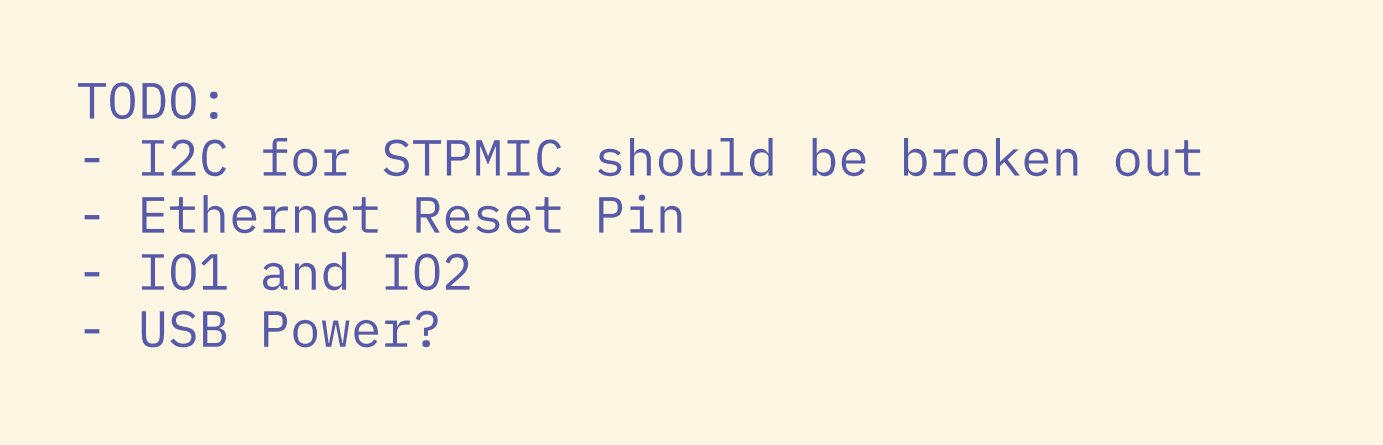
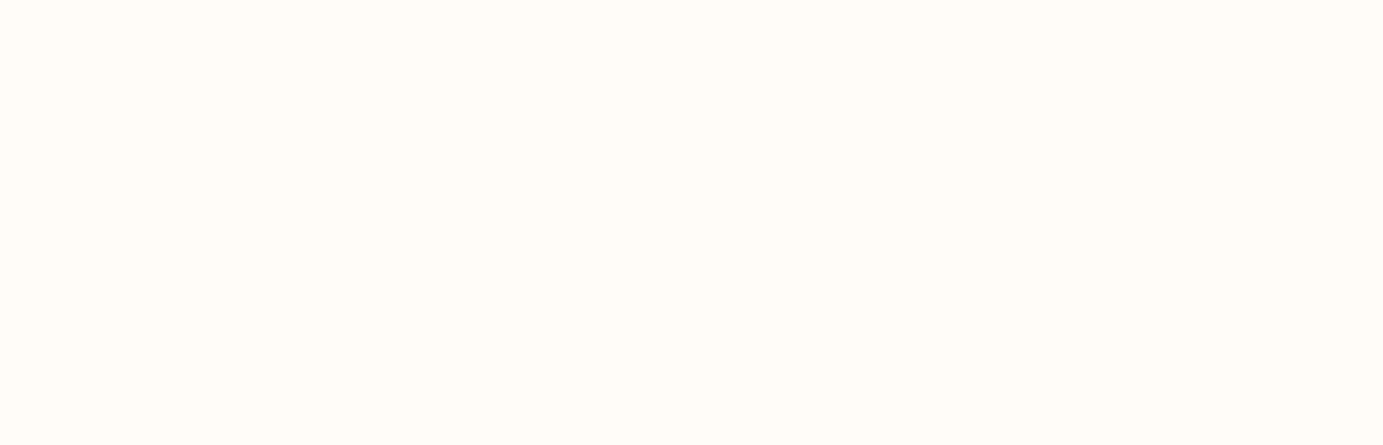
text: TODO: (147, 100) -> none
text: - I2C for STPMIC should be broken out (642, 157) -> none
text: - Ethernet Reset Pin (382, 213) -> none
text: - IO1 and IO2 (277, 271) -> none
text: - USB Power? (261, 329) -> none

